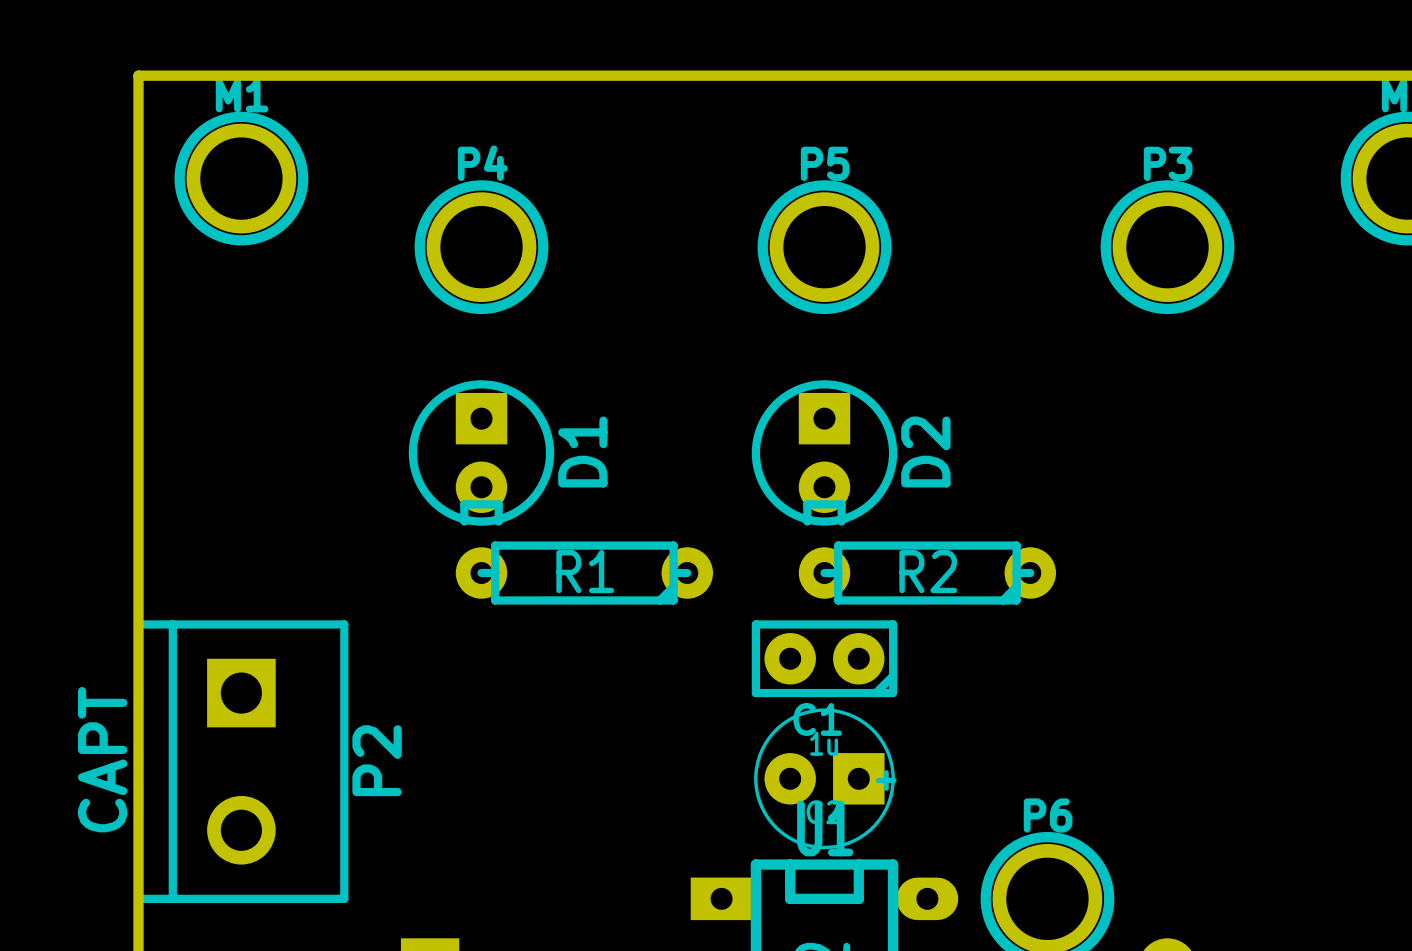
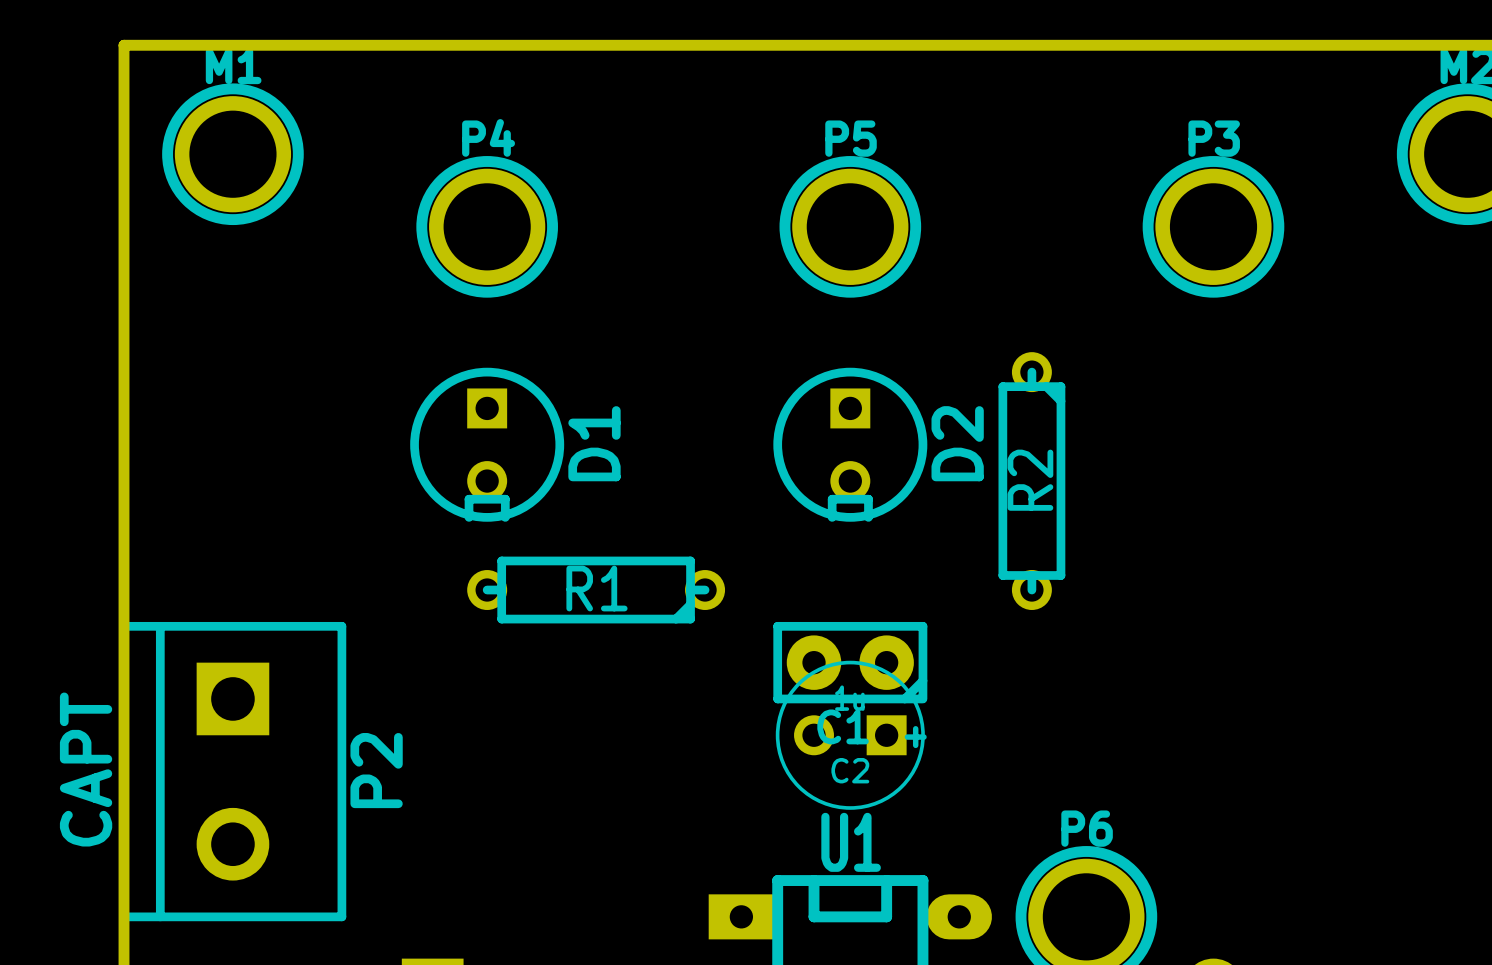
D1 footprint: [408, 380, 555, 526] -> [410, 367, 565, 522]
D2 footprint: [751, 380, 898, 526] -> [773, 367, 928, 522]
R1 footprint: [455, 541, 714, 605] -> [467, 556, 726, 624]
R2 footprint: [798, 541, 1057, 605] -> [998, 352, 1066, 610]
R1 name position: R1 (585, 571) -> R1 (596, 588)
C2 footprint: [754, 708, 895, 850] -> [775, 660, 925, 810]

